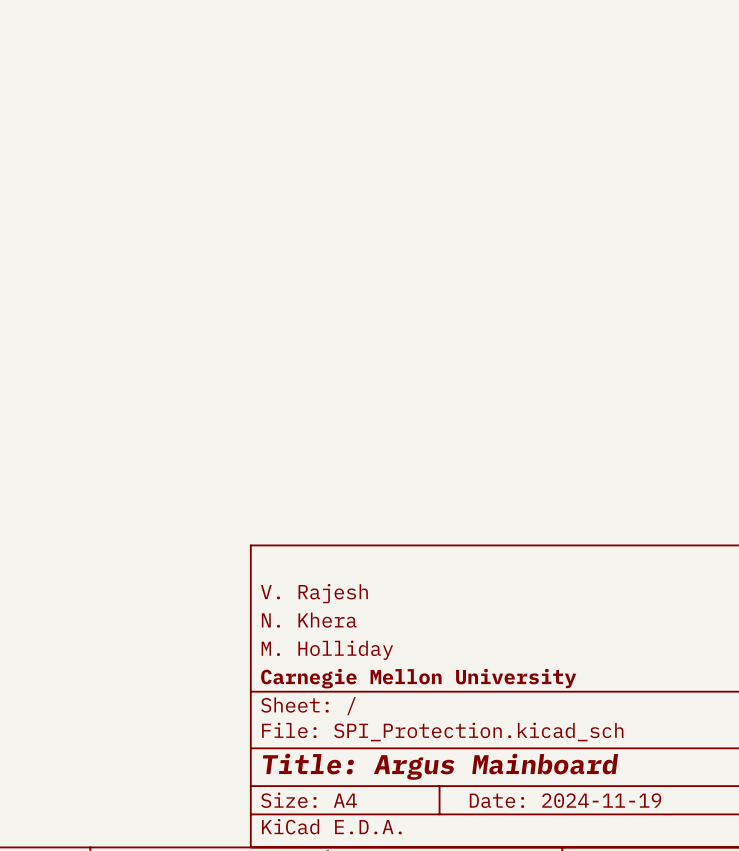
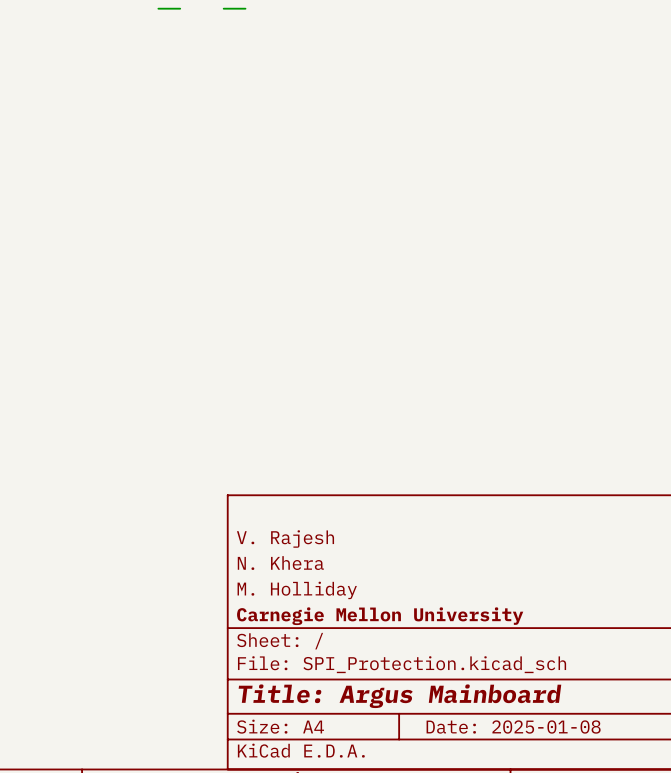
wire: none -> (158, 8) (180, 8)
wire: none -> (223, 8) (245, 8)
title block: Date: 2024-11-19 (565, 800) -> Date: 2025-01-08 (513, 727)

